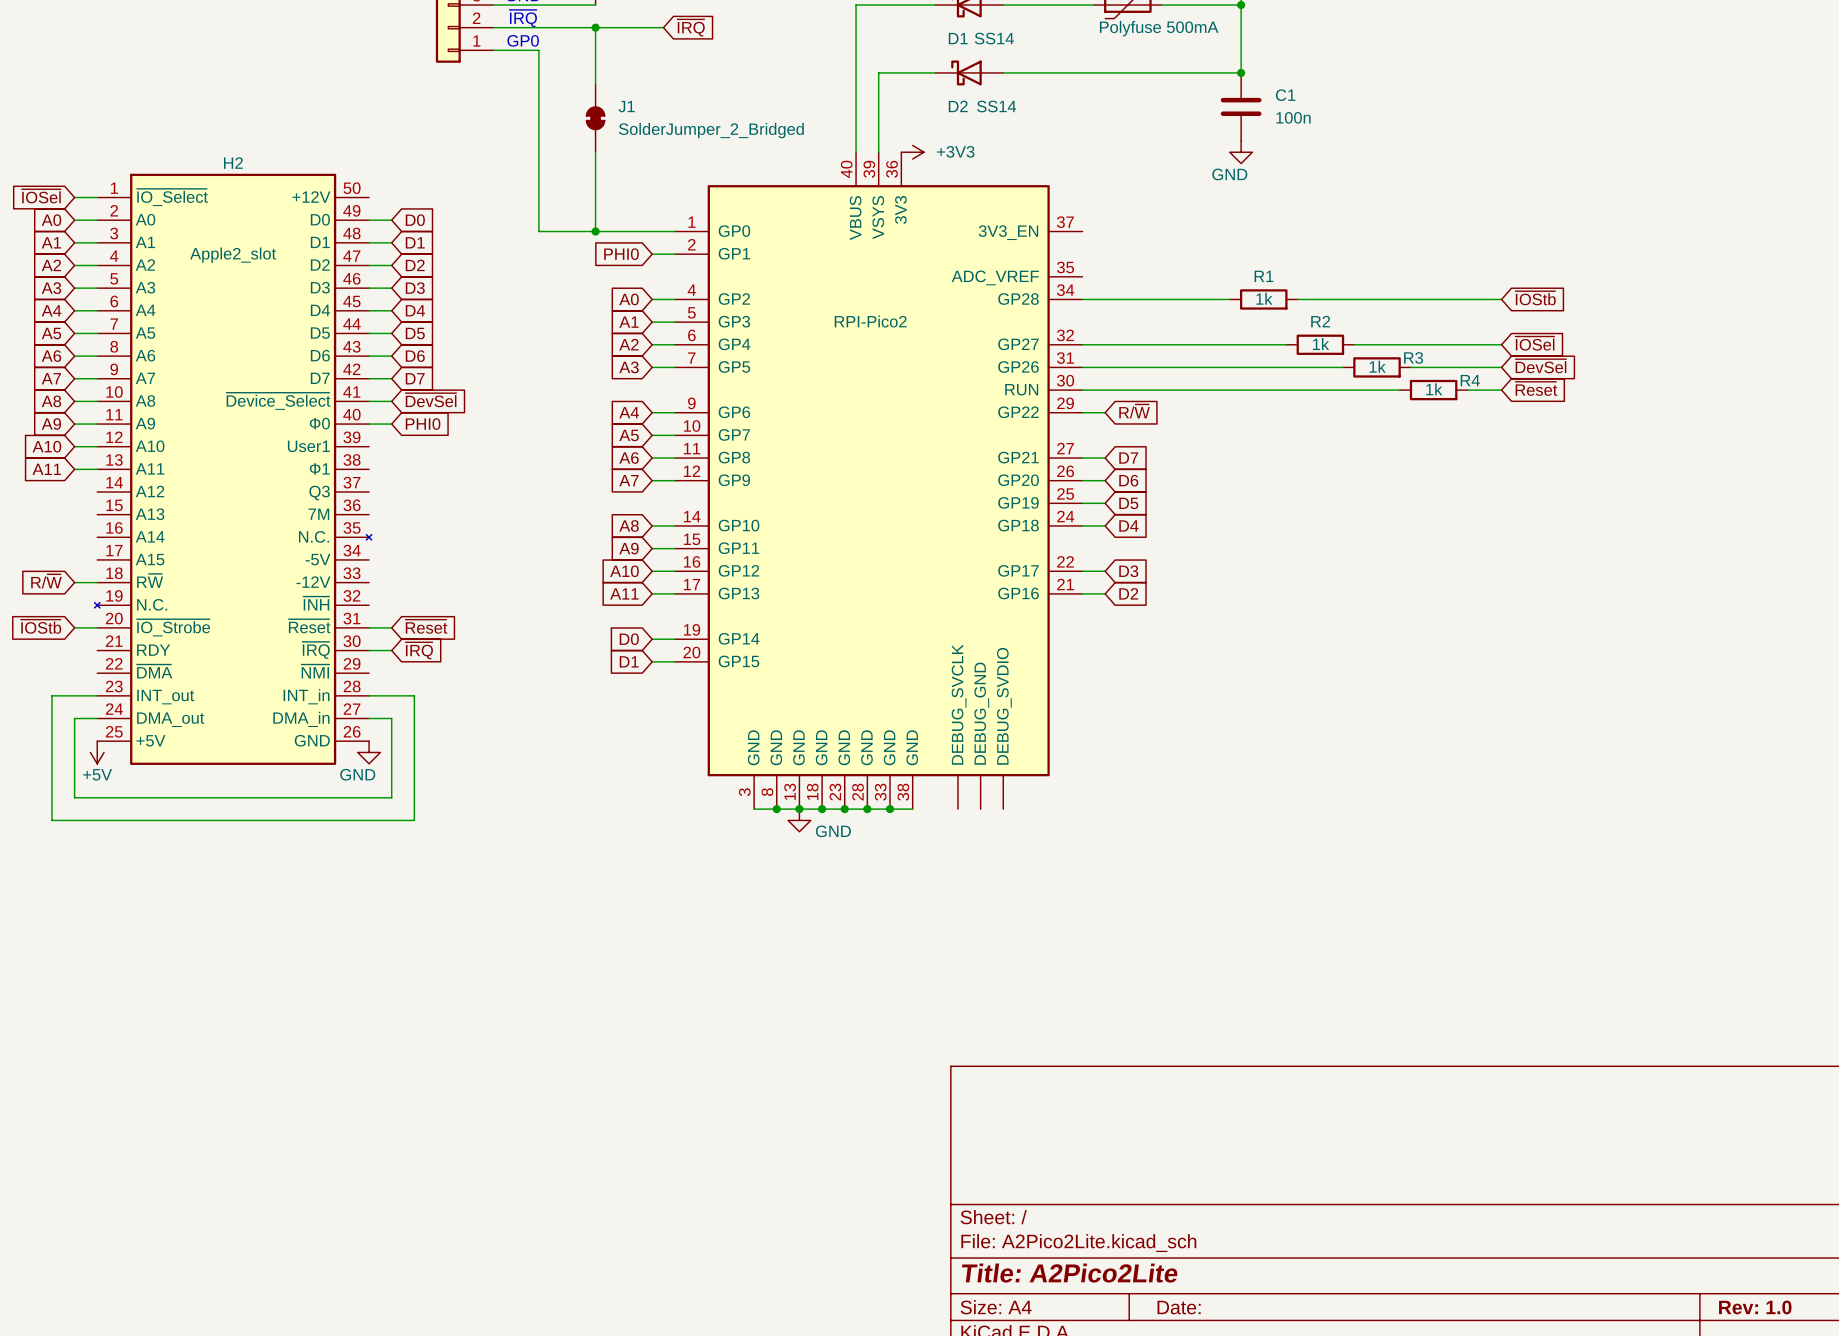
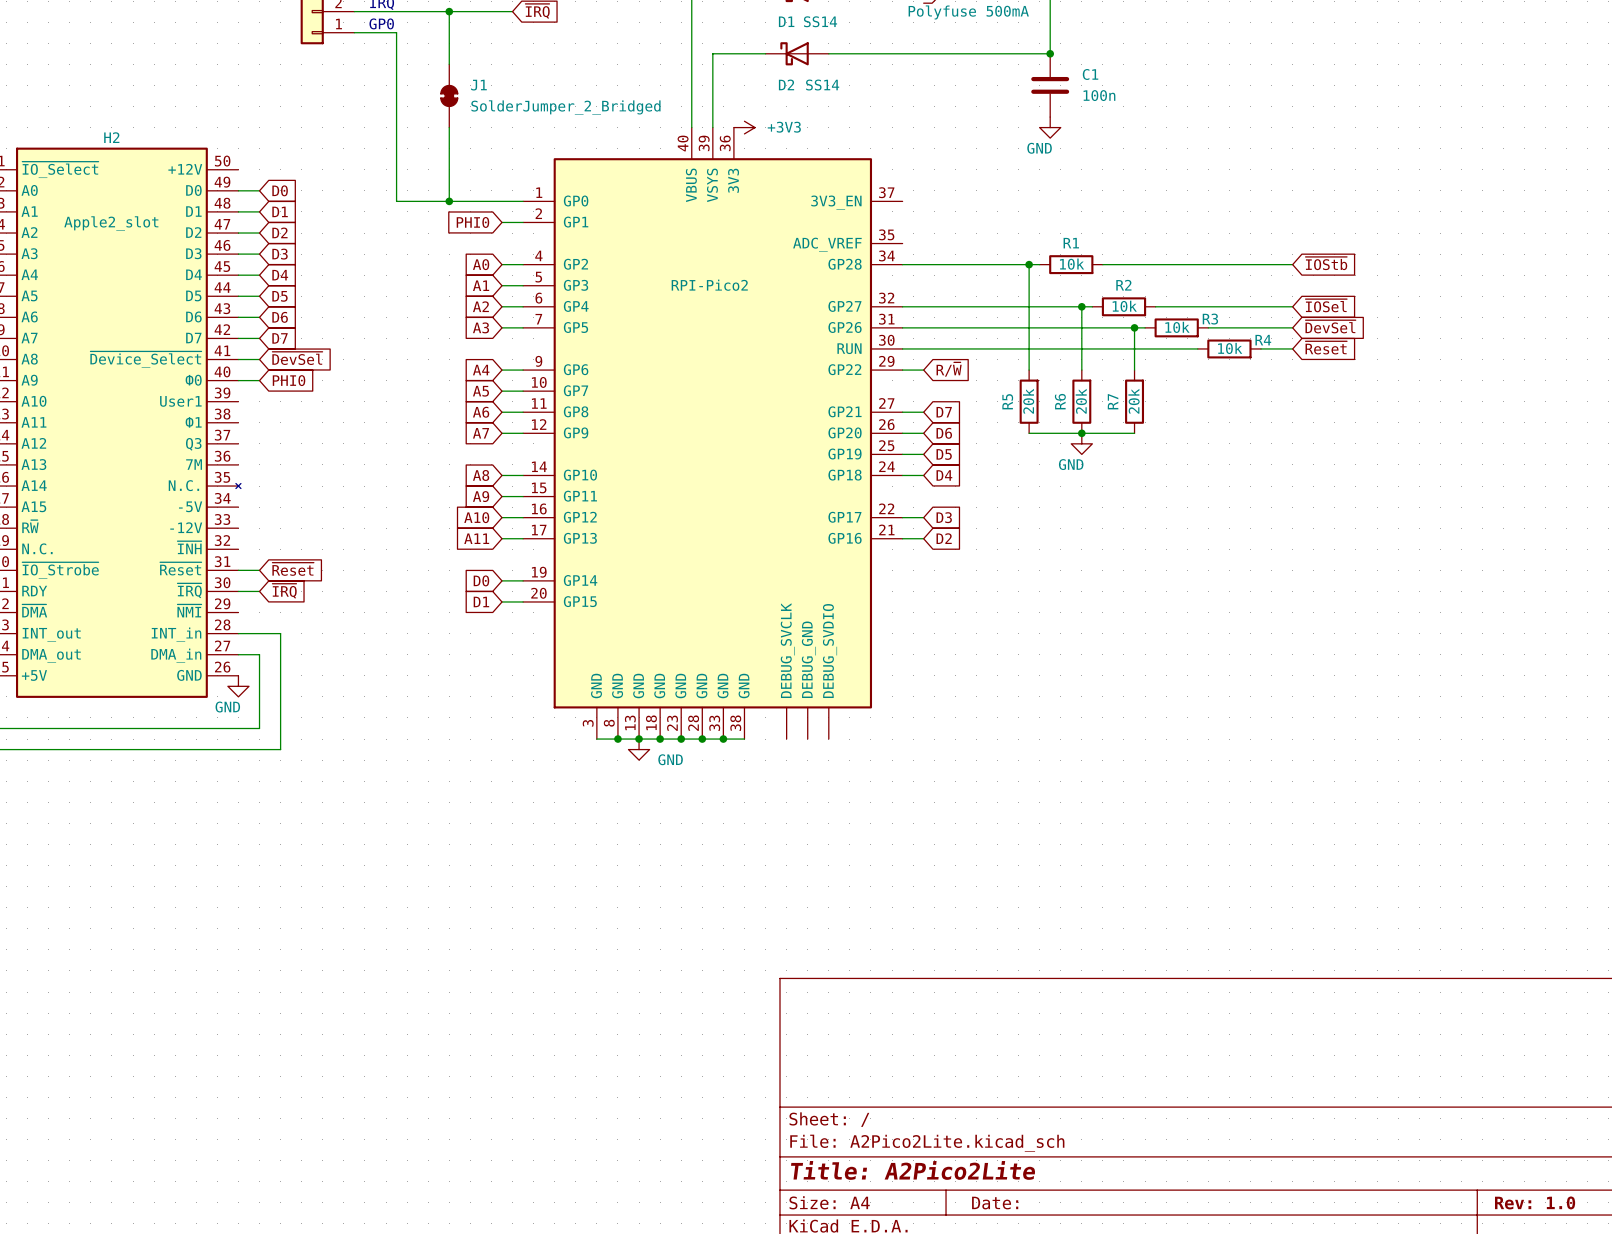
R1 value: 1k (1264, 298) -> 10k (1072, 264)
wire: none -> (1029, 264) (1029, 370)
junction: none -> (1029, 264)
wire: none -> (1081, 306) (1081, 370)
junction: none -> (1081, 306)
R2 value: 1k (1321, 344) -> 10k (1124, 306)
R3 value: 1k (1377, 366) -> 10k (1177, 327)
wire: none -> (1134, 327) (1134, 370)
junction: none -> (1134, 327)
R4 value: 1k (1434, 389) -> 10k (1230, 348)
R5: none -> 20k (1029, 401)
R6: none -> 20k (1081, 401)
R7: none -> 20k (1134, 401)
wire: none -> (1029, 433) (1134, 433)
junction: none -> (1081, 433)
power symbol: none -> GND (1081, 443)

